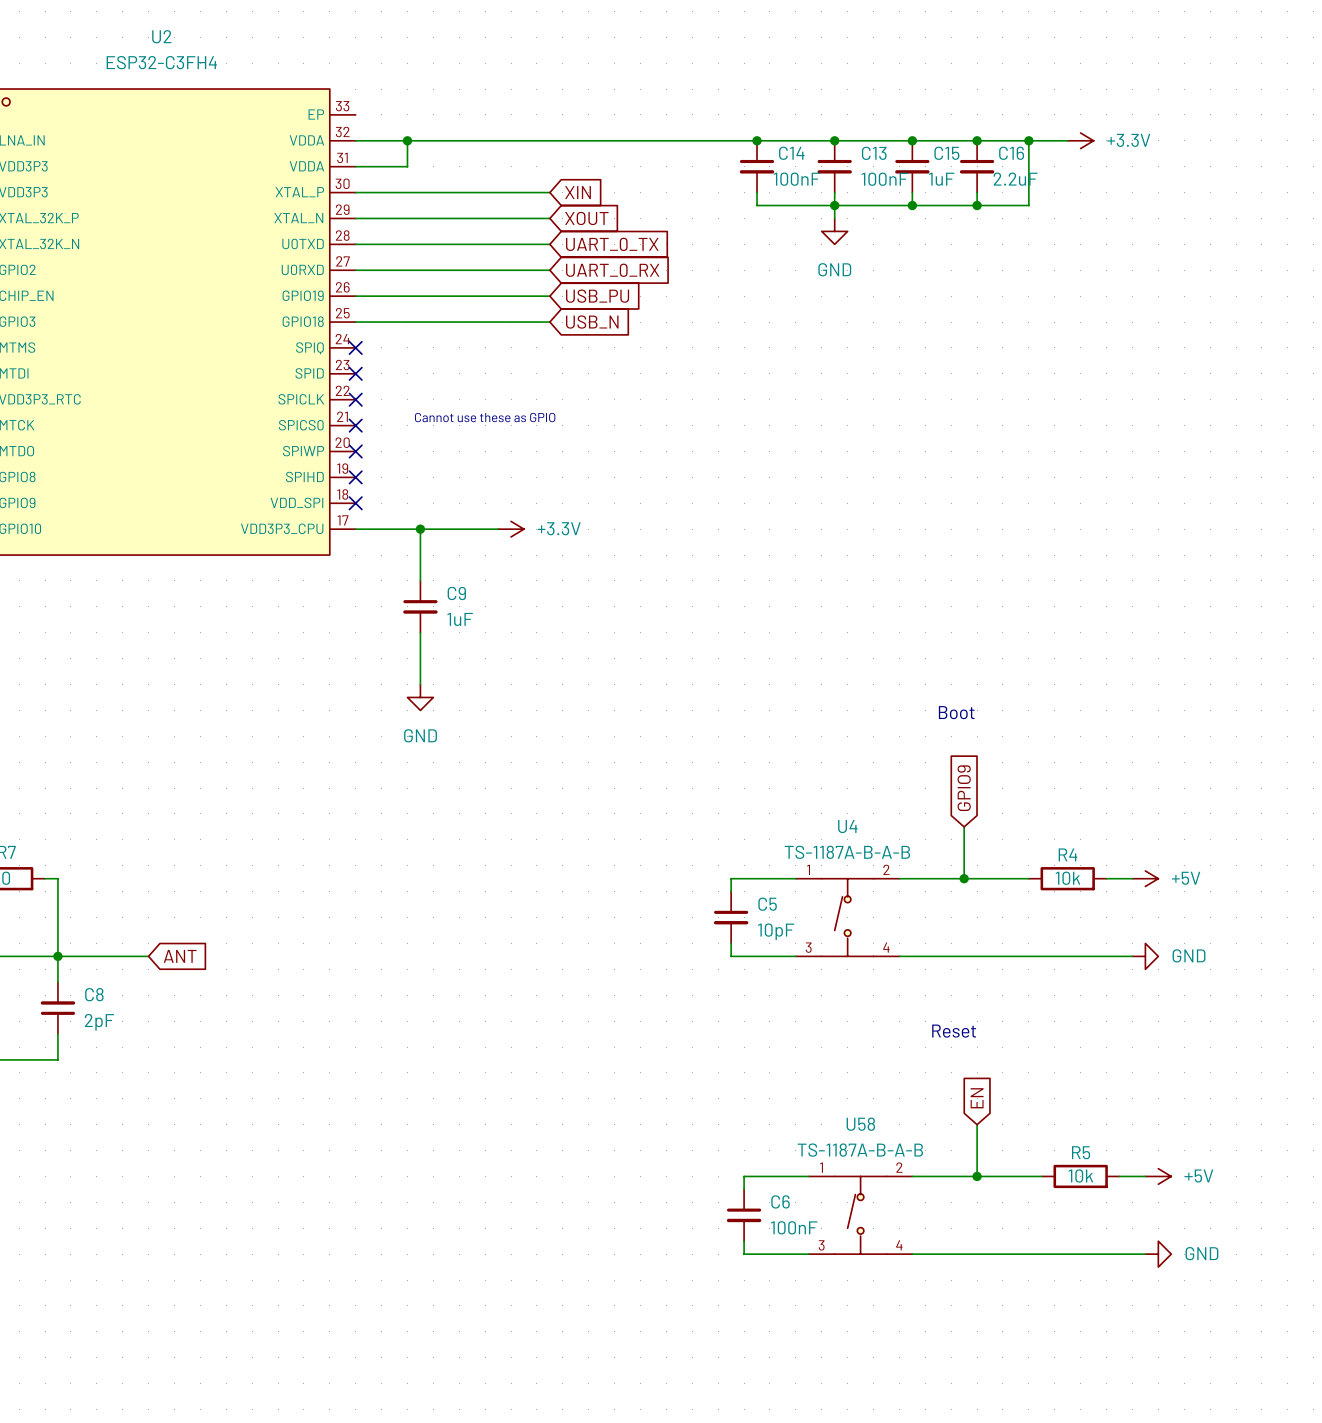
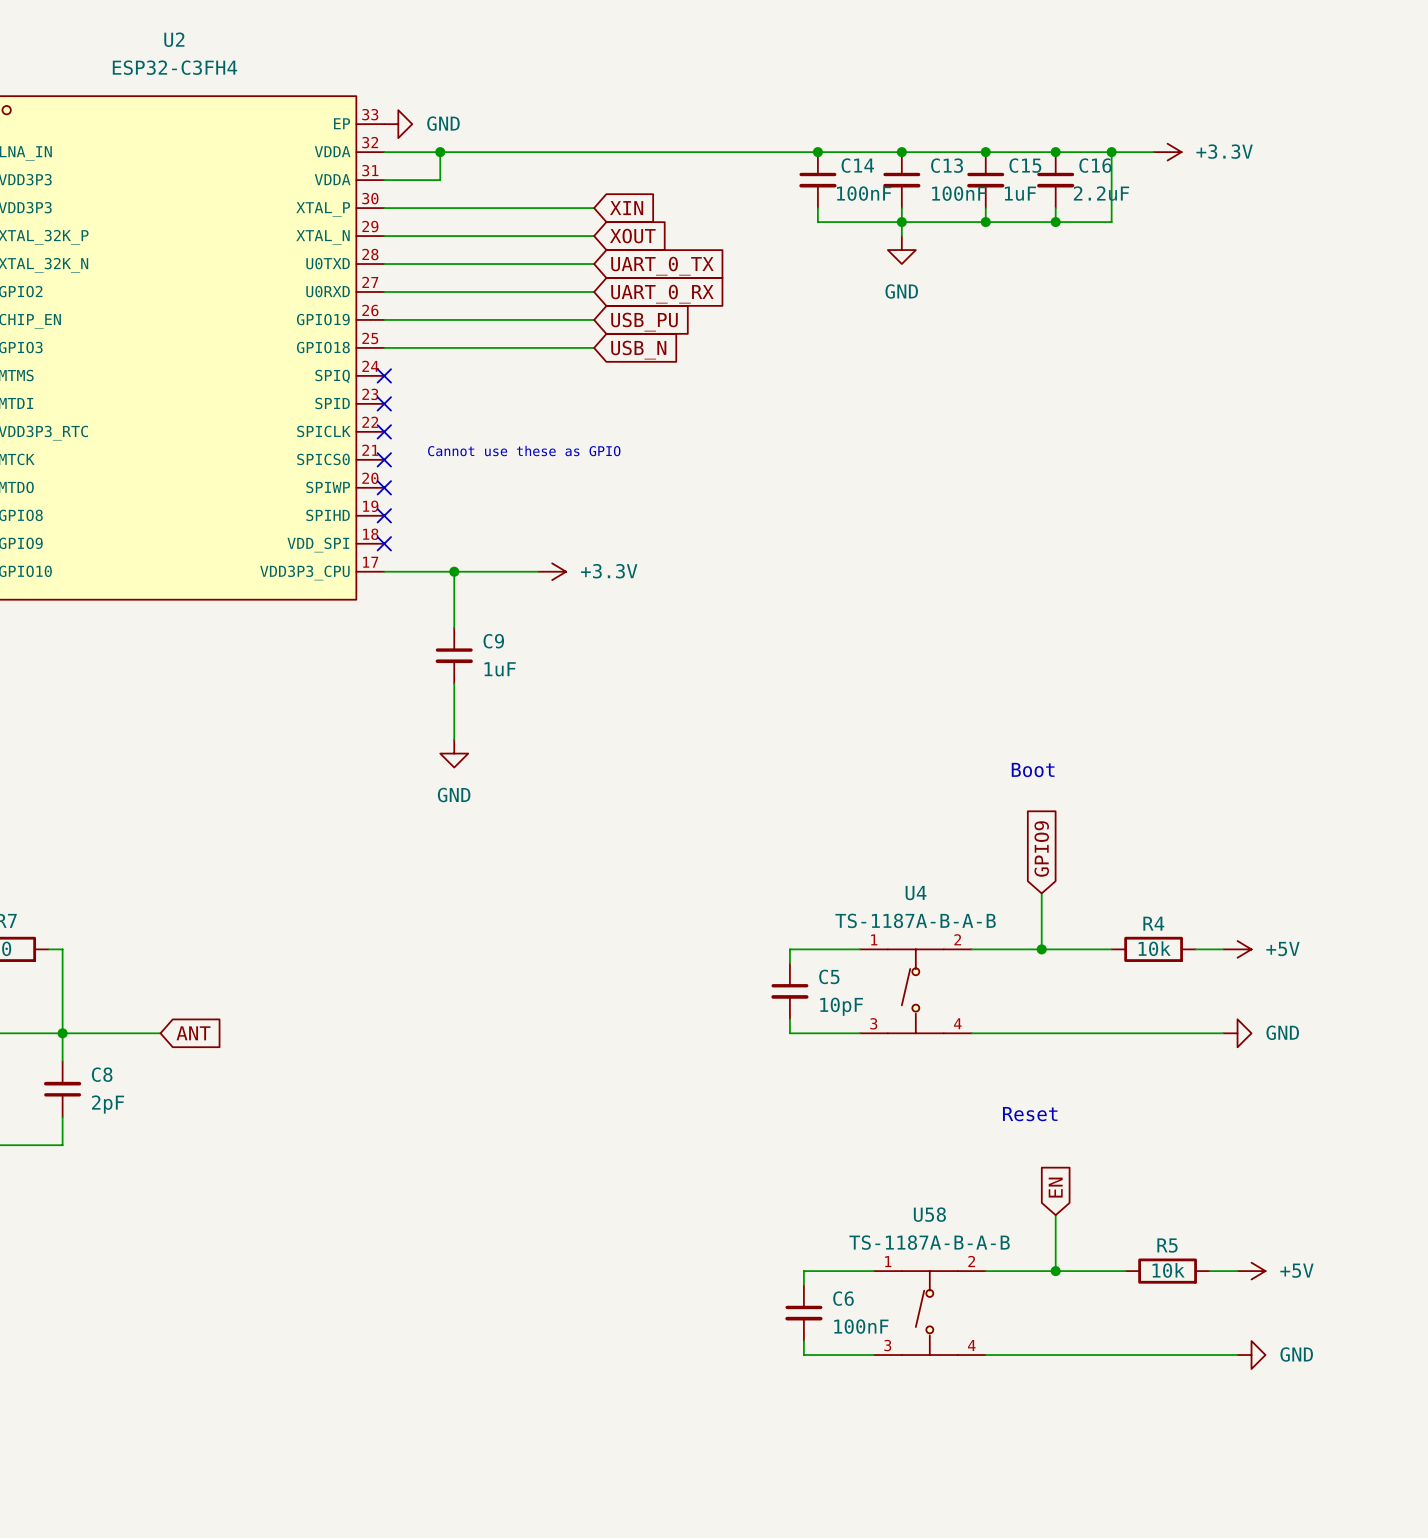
power symbol: none -> GND (398, 124)

